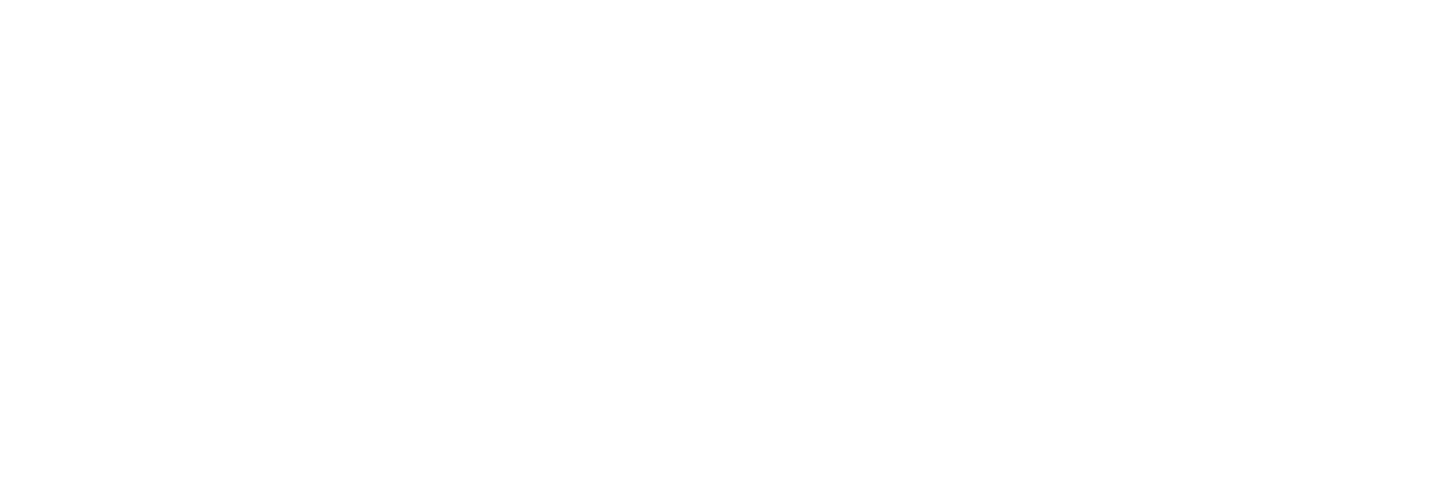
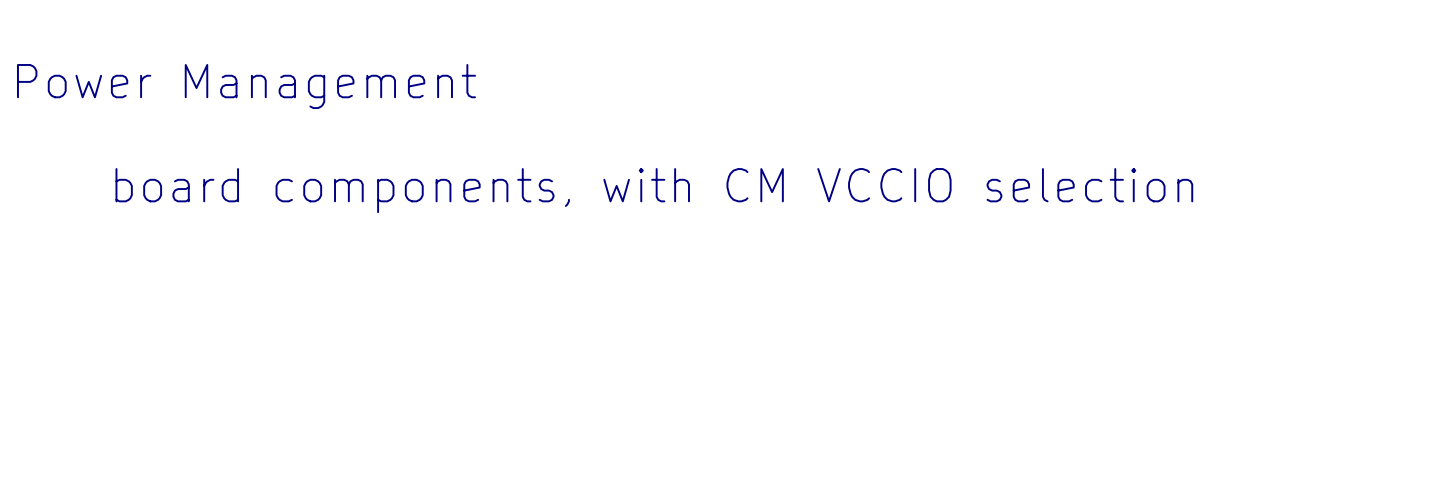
text: none -> Power Management (246, 86)
text: none -> board components, with CM VCCIO selection (654, 190)

